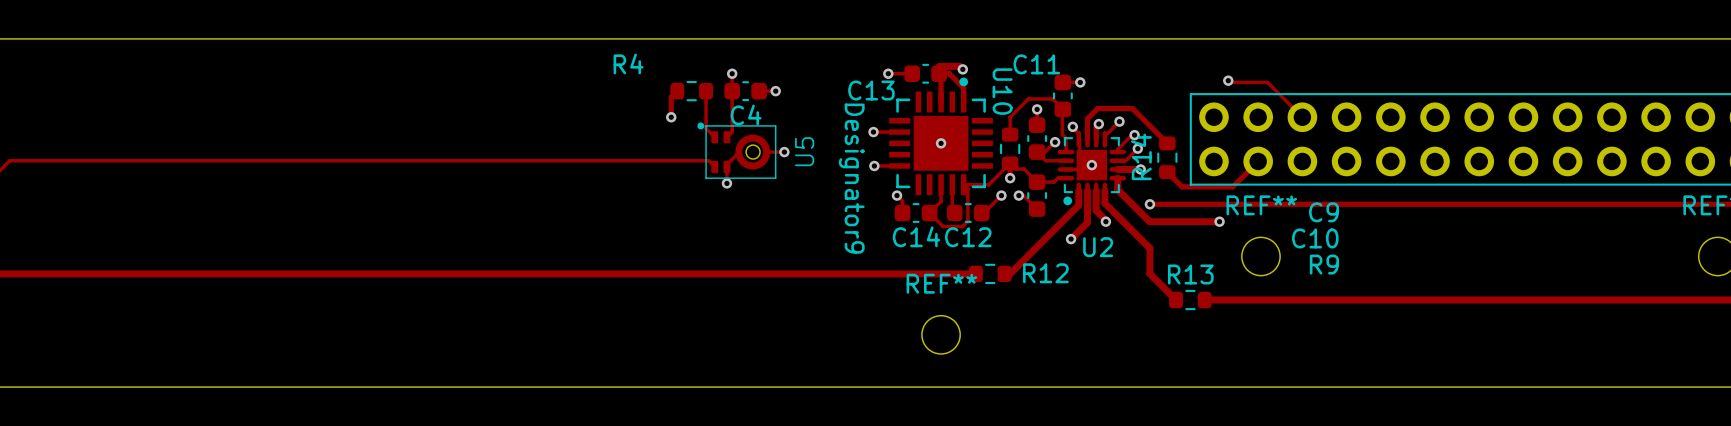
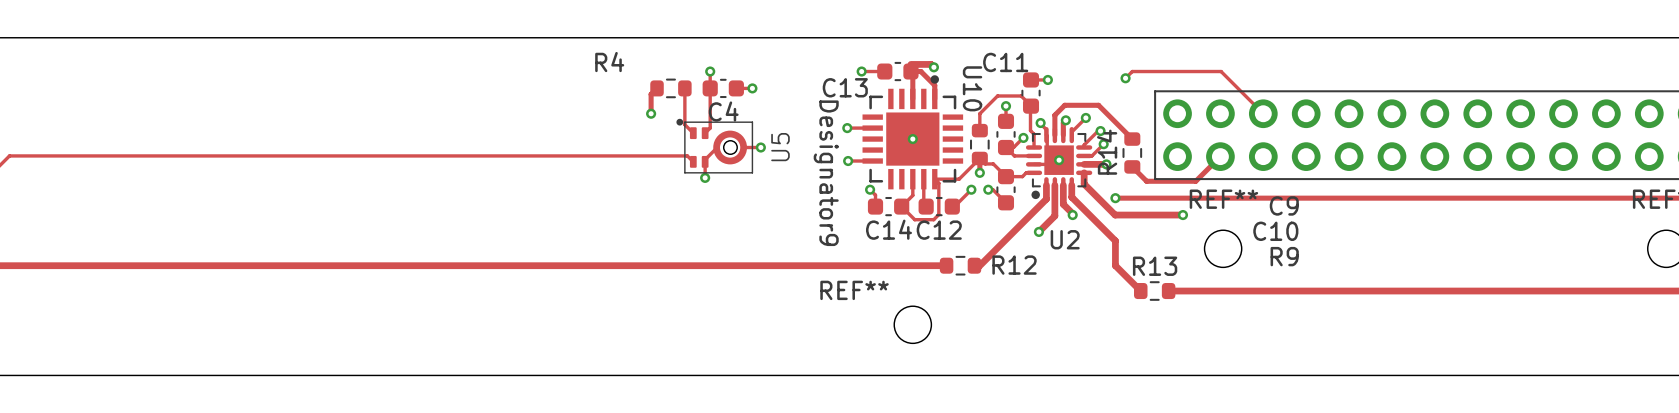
track: (1228, 80) (1230, 82) (1267, 82) -> (1125, 78) (1132, 71) (1221, 71) (1229, 79)
via position: (1228, 80) -> (1125, 78)
REF** name position: REF** (941, 283) -> REF** (854, 290)

